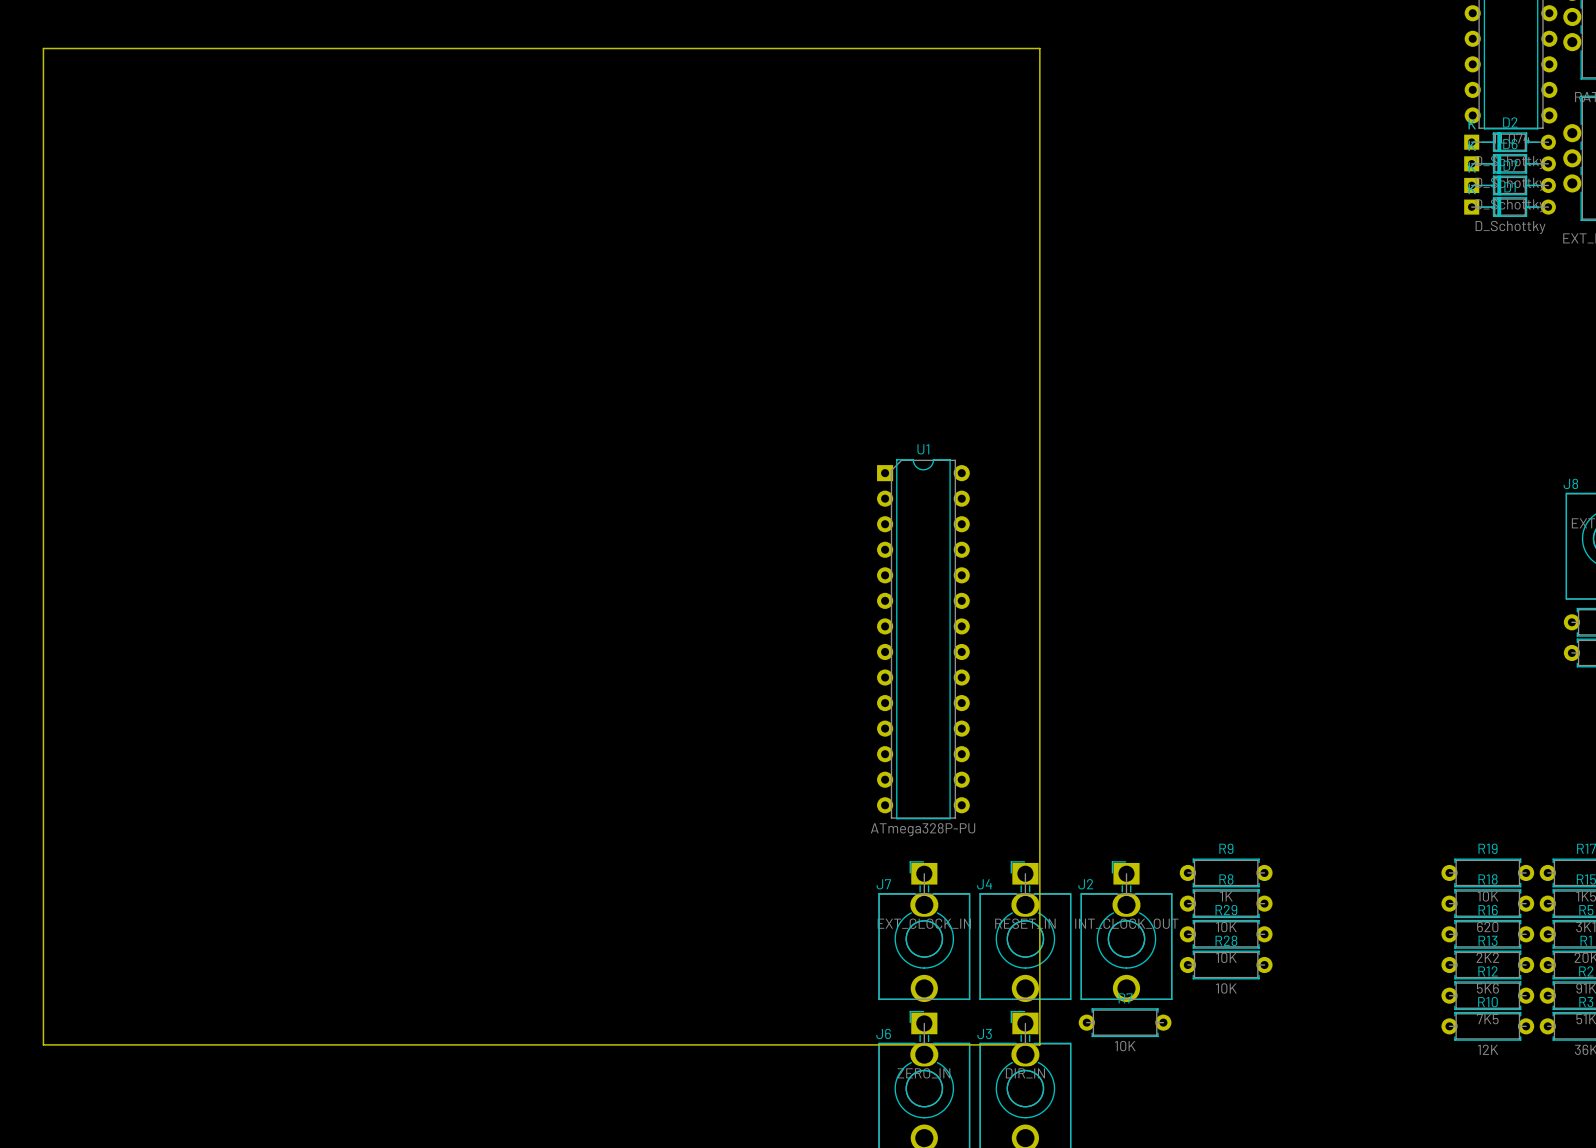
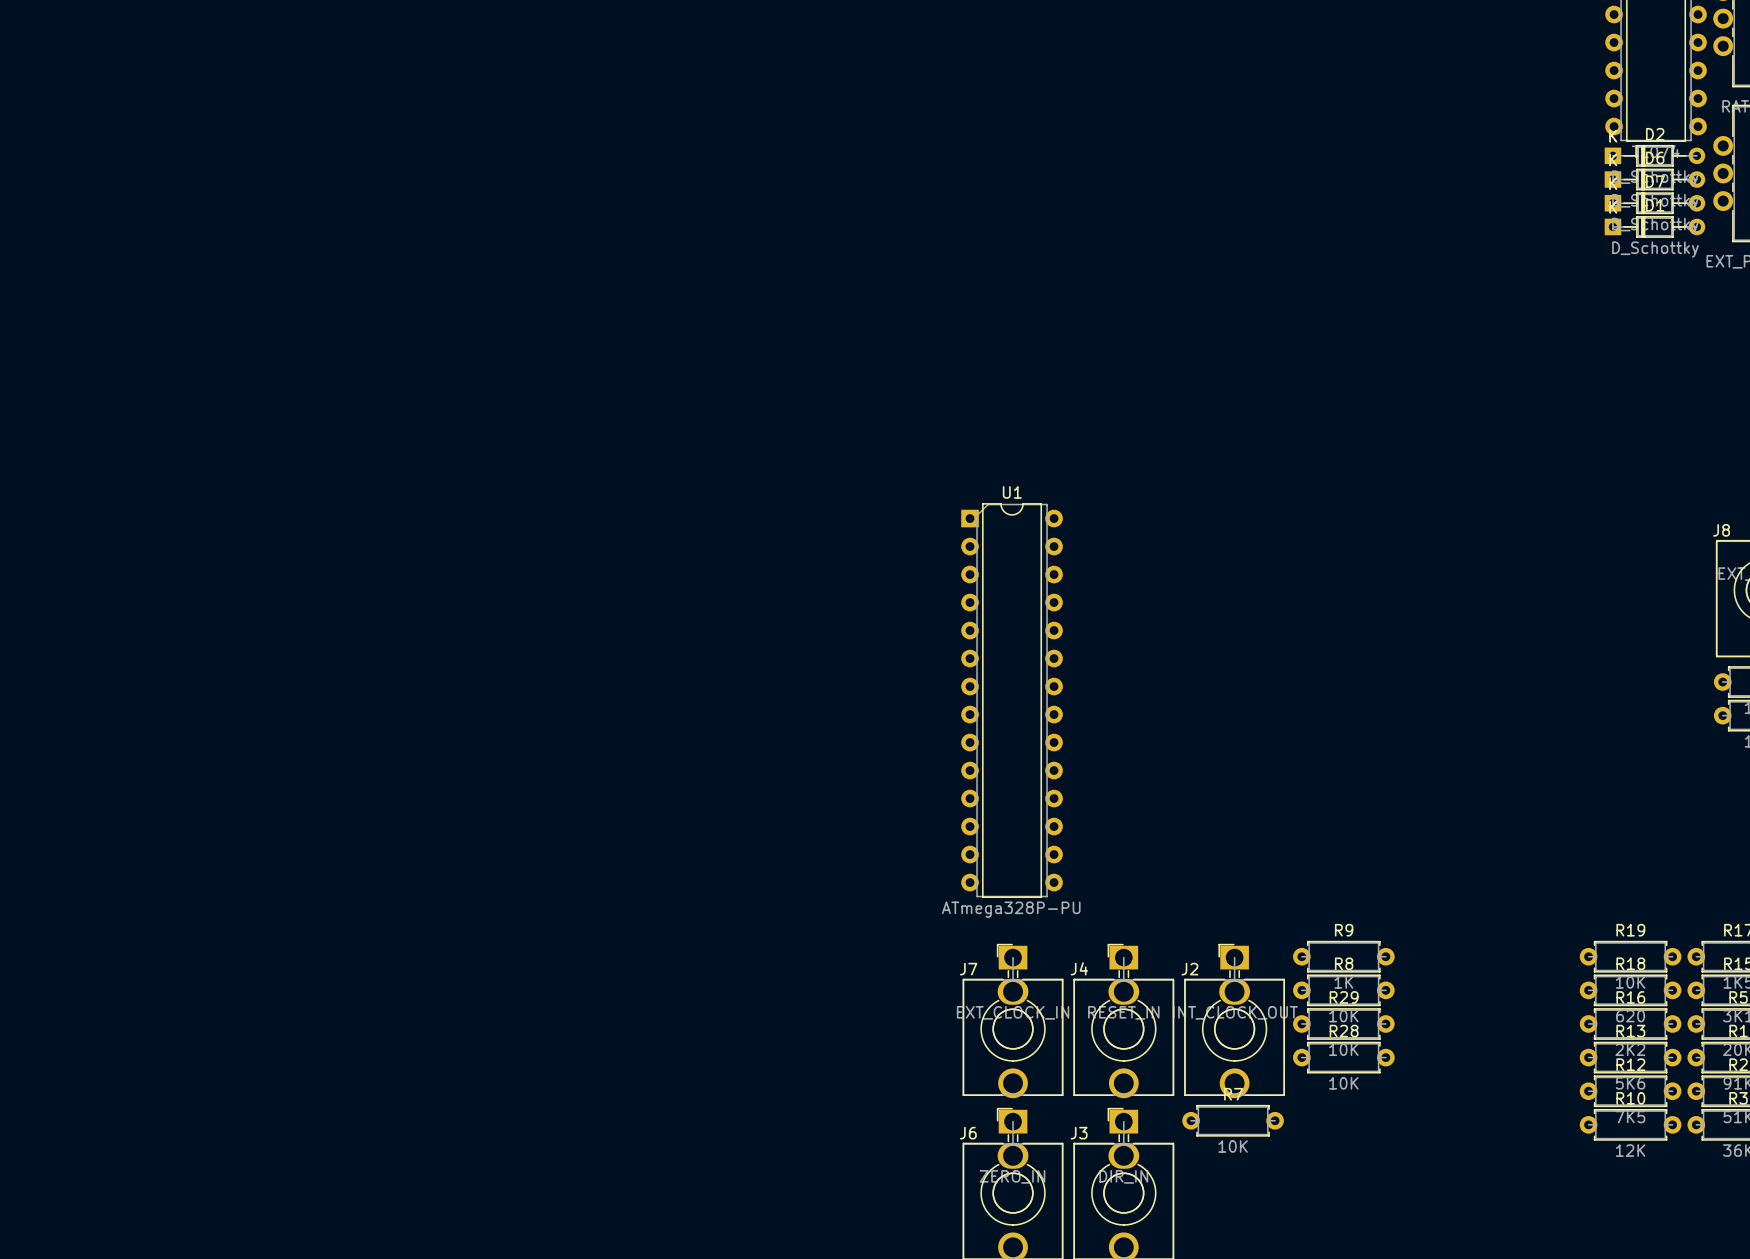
board edge: (43, 48) (43, 1044) (1039, 1044) (1039, 48) (43, 48) -> none

